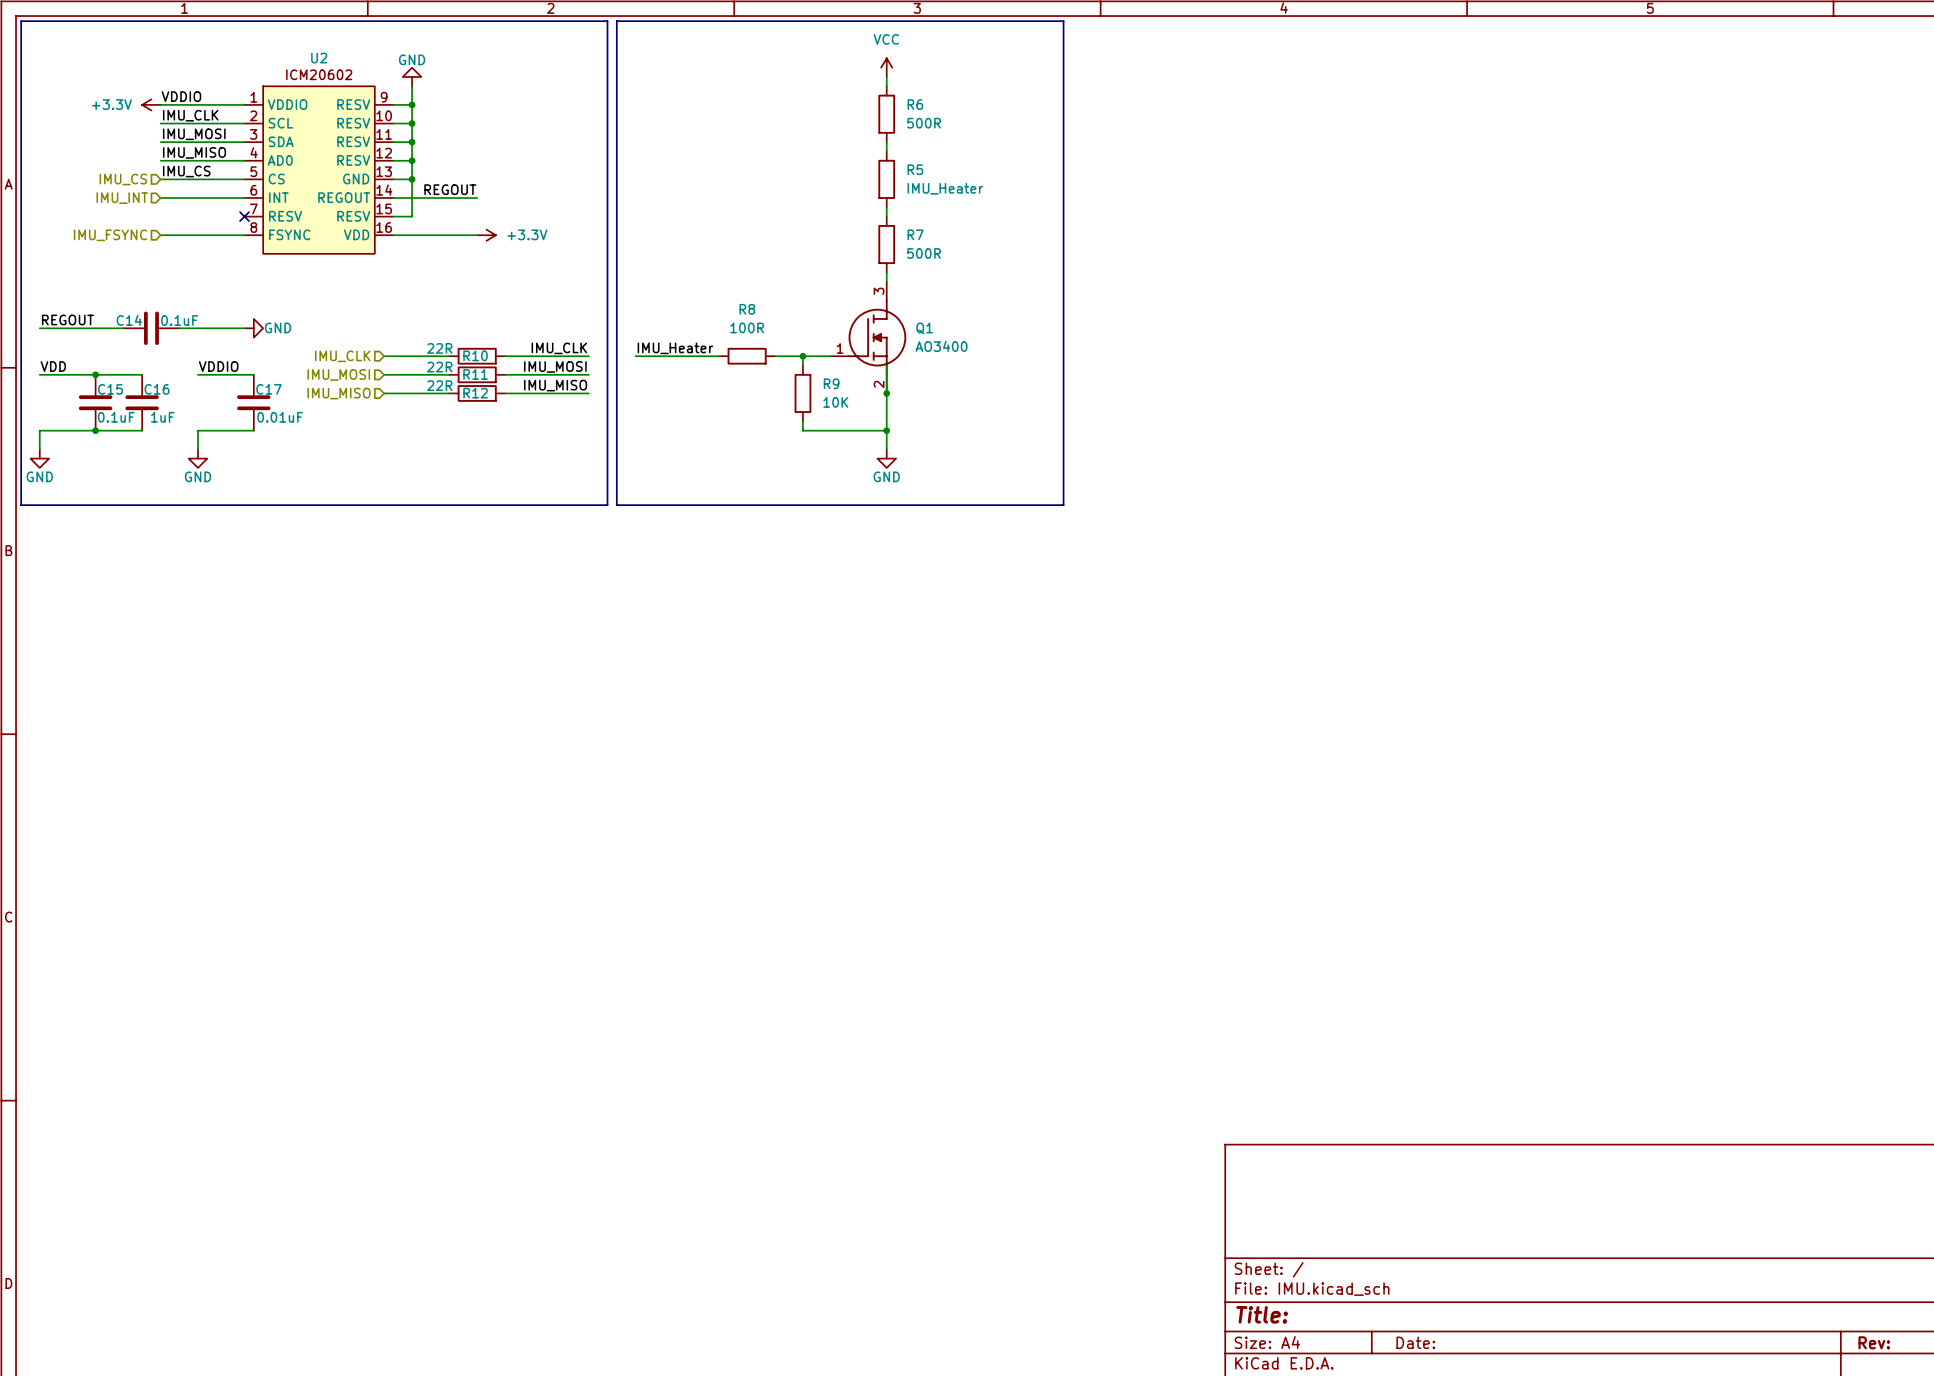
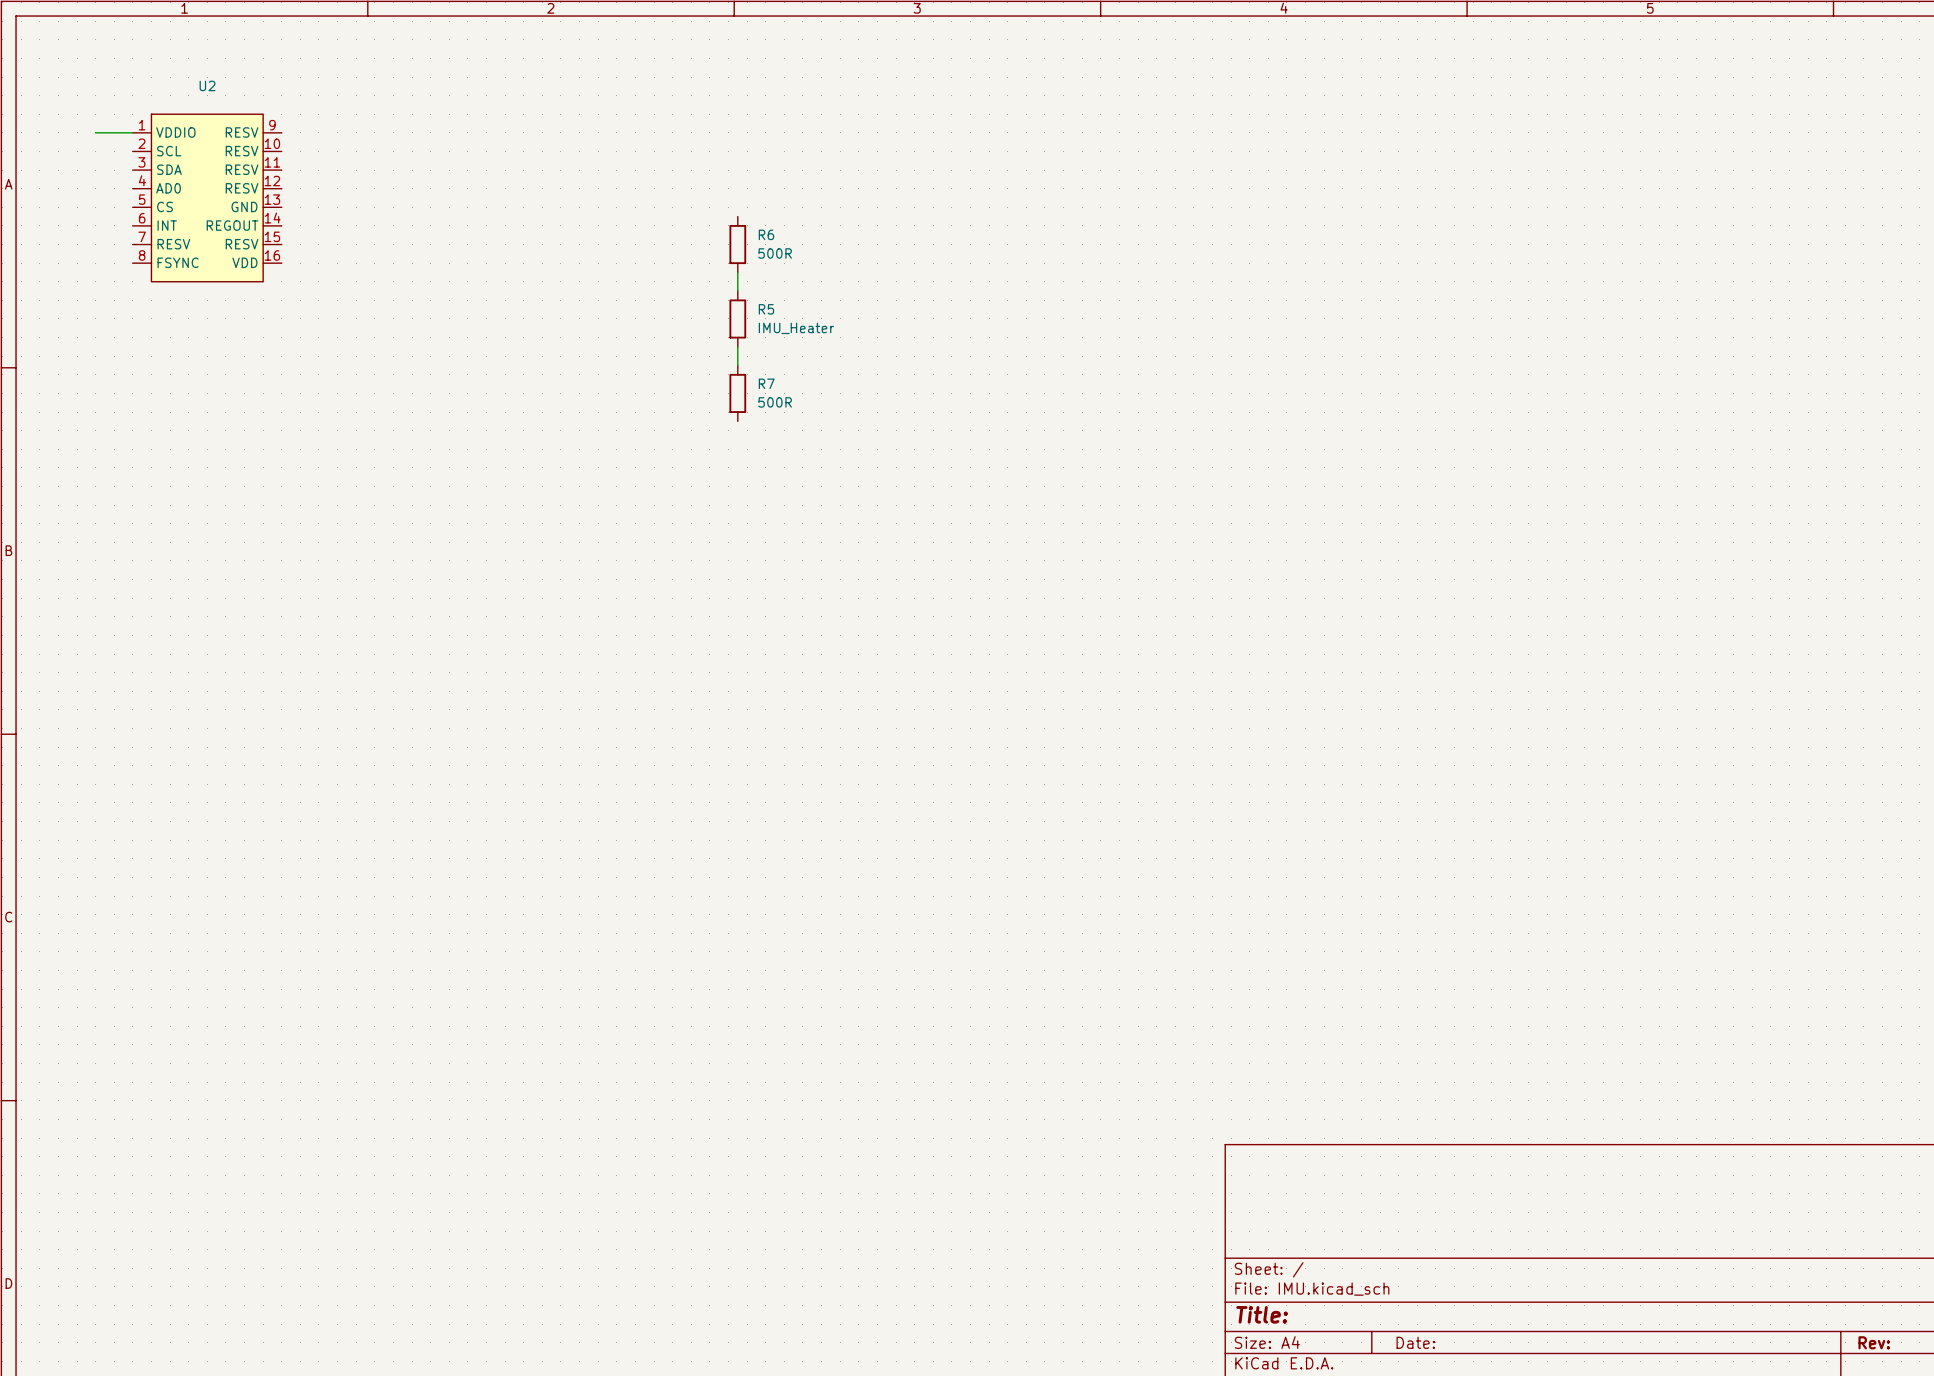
line: (21, 21) (607, 21) (607, 505) (21, 505) (21, 21) -> none
line: (616, 21) (1063, 21) (1063, 505) (616, 505) (616, 21) -> none
power symbol: VCC (886, 67) -> none
U2 text: ICM20602 (319, 74) -> none
power symbol: GND (412, 77) -> none
wire: (886, 77) (886, 86) -> none
wire: (412, 86) (412, 216) (393, 216) -> none
label: VDDIO (181, 96) -> none
power symbol: +3.3V (151, 104) -> none
wire: (160, 104) (244, 104) -> none
wire: (393, 104) (412, 104) -> none
junction: (412, 104) -> none
R6 position: (886, 114) -> (737, 244)
label: IMU_CLK (190, 115) -> none
wire: (393, 123) (412, 123) -> none
junction: (412, 123) -> none
wire: none -> (95, 132) (132, 132)
label: IMU_MOSI (194, 134) -> none
wire: (393, 142) (412, 142) -> none
junction: (412, 142) -> none
wire: (886, 142) (886, 151) -> none
label: IMU_MISO (194, 152) -> none
wire: (393, 160) (412, 160) -> none
junction: (412, 160) -> none
U2 position: (318, 170) -> (207, 197)
label: IMU_CS (186, 171) -> none
hierarchical label: IMU_CS (123, 179) -> none
wire: (393, 179) (412, 179) -> none
junction: (412, 179) -> none
R5 position: (886, 179) -> (737, 318)
label: REGOUT (450, 189) -> none
wire: (393, 197) (477, 197) -> none
hierarchical label: IMU_INT (122, 198) -> none
wire: (886, 207) (886, 216) -> none
no-connect mark: (244, 216) -> none
hierarchical label: IMU_FSYNC (110, 235) -> none
wire: (393, 235) (477, 235) -> none
power symbol: +3.3V (486, 235) -> none
R7 position: (886, 244) -> (737, 393)
wire: none -> (737, 272) (737, 291)
wire: (886, 272) (886, 281) -> none
label: REGOUT (67, 319) -> none
wire: (39, 328) (123, 328) -> none
C14: 0.1uF (151, 328) -> none
wire: (179, 328) (244, 328) -> none
power symbol: GND (253, 328) -> none
Q1: AO3400 (868, 337) -> none
wire: none -> (737, 346) (737, 365)
label: IMU_CLK (559, 348) -> none
label: IMU_Heater (675, 348) -> none
hierarchical label: IMU_CLK (342, 356) -> none
wire: (384, 356) (449, 356) -> none
R10: 22R (477, 356) -> none
wire: (505, 356) (588, 356) -> none
wire: (635, 356) (719, 356) -> none
R8: 100R (747, 356) -> none
wire: (775, 356) (830, 356) -> none
wire: (802, 356) (802, 365) -> none
junction: (802, 356) -> none
wire: (886, 365) (886, 449) -> none
label: VDD (53, 366) -> none
label: VDDIO (218, 366) -> none
label: IMU_MOSI (555, 366) -> none
wire: (39, 374) (142, 374) -> none
junction: (95, 374) -> none
wire: (197, 374) (253, 374) -> none
hierarchical label: IMU_MOSI (338, 374) -> none
wire: (384, 374) (449, 374) -> none
R11: 22R (477, 374) -> none
wire: (505, 374) (588, 374) -> none
label: IMU_MISO (555, 385) -> none
hierarchical label: IMU_MISO (339, 393) -> none
wire: (384, 393) (449, 393) -> none
R12: 22R (477, 393) -> none
wire: (505, 393) (588, 393) -> none
R9: 10K (802, 393) -> none
junction: (886, 393) -> none
C15: 0.1uF (95, 402) -> none
C16: 1uF (142, 402) -> none
C17: 0.01uF (253, 402) -> none
wire: (802, 421) (802, 430) (886, 430) -> none
junction: (95, 430) -> none
wire: (142, 430) (39, 430) (39, 449) -> none
wire: (253, 430) (197, 430) (197, 449) -> none
junction: (886, 430) -> none
power symbol: GND (39, 458) -> none
power symbol: GND (197, 458) -> none
power symbol: GND (886, 458) -> none

